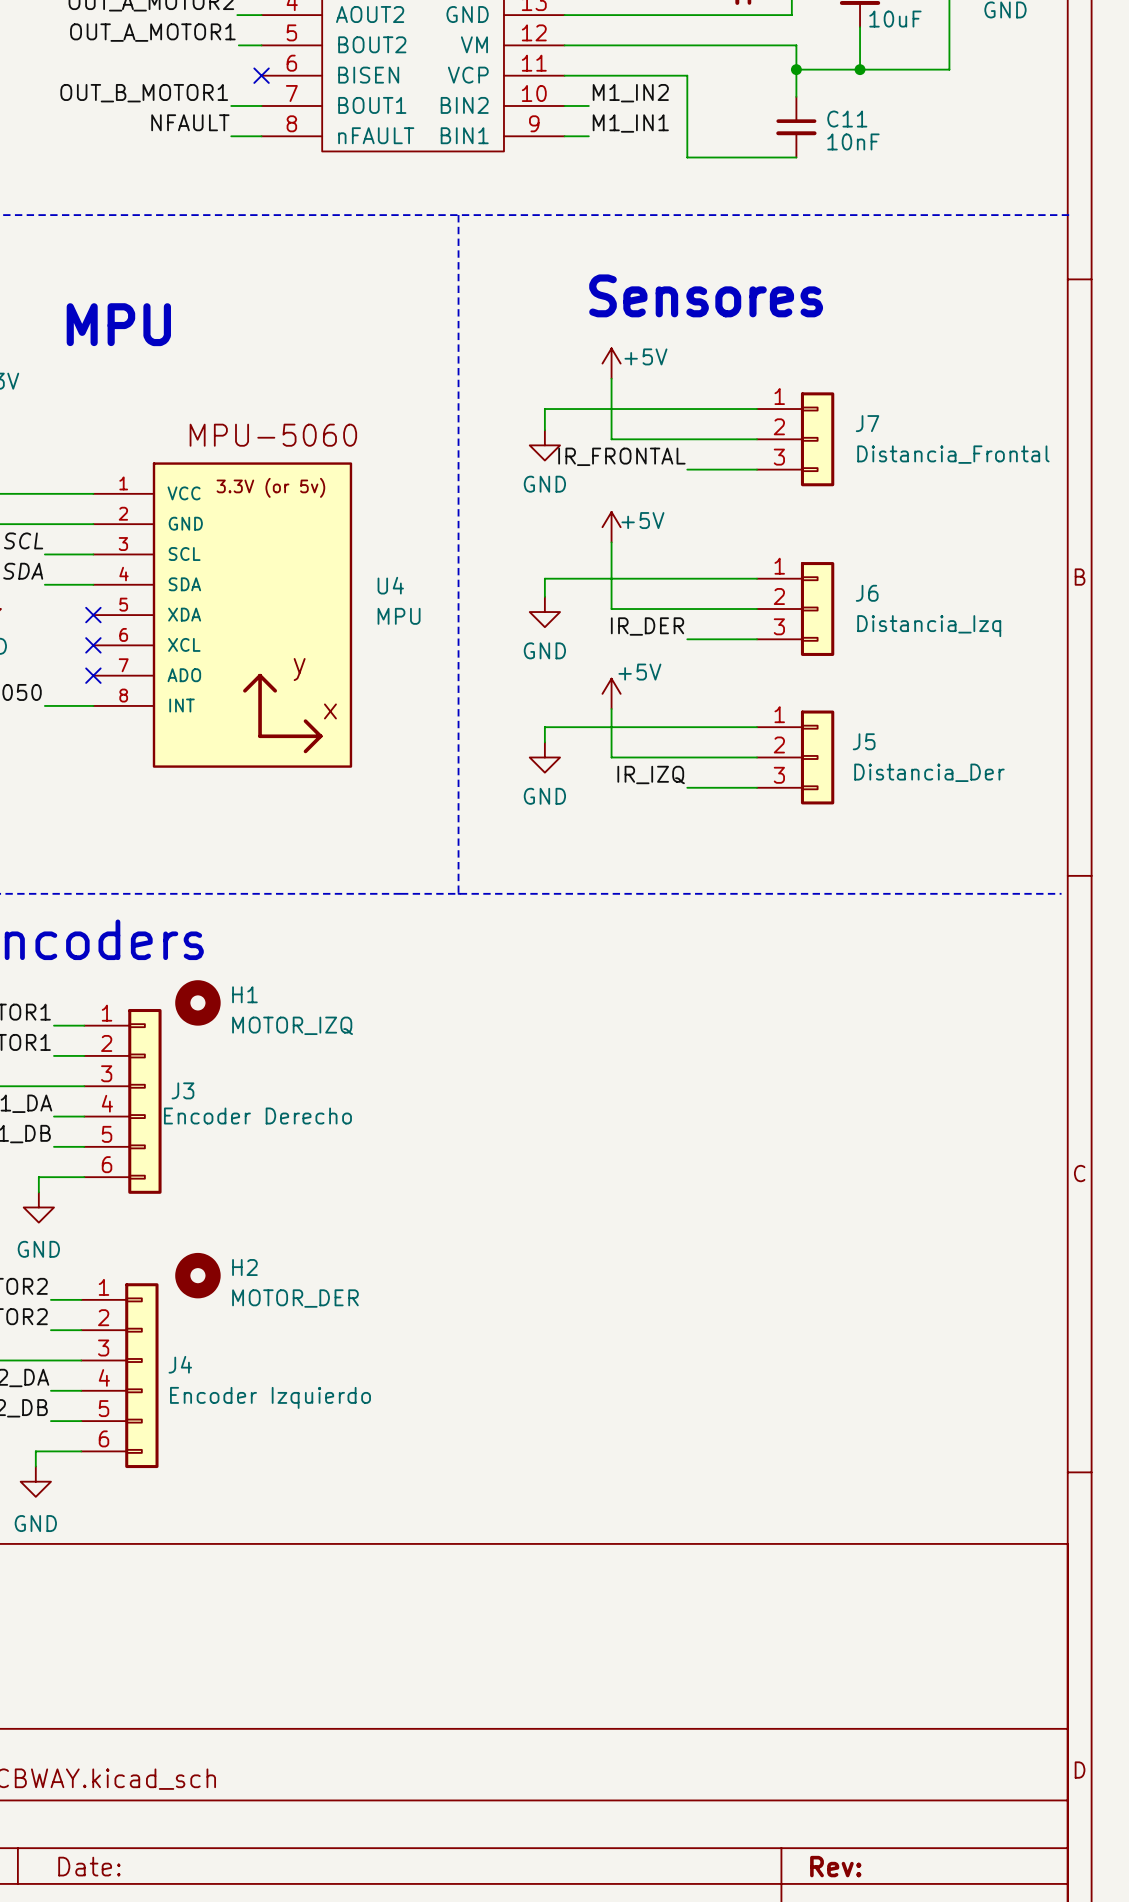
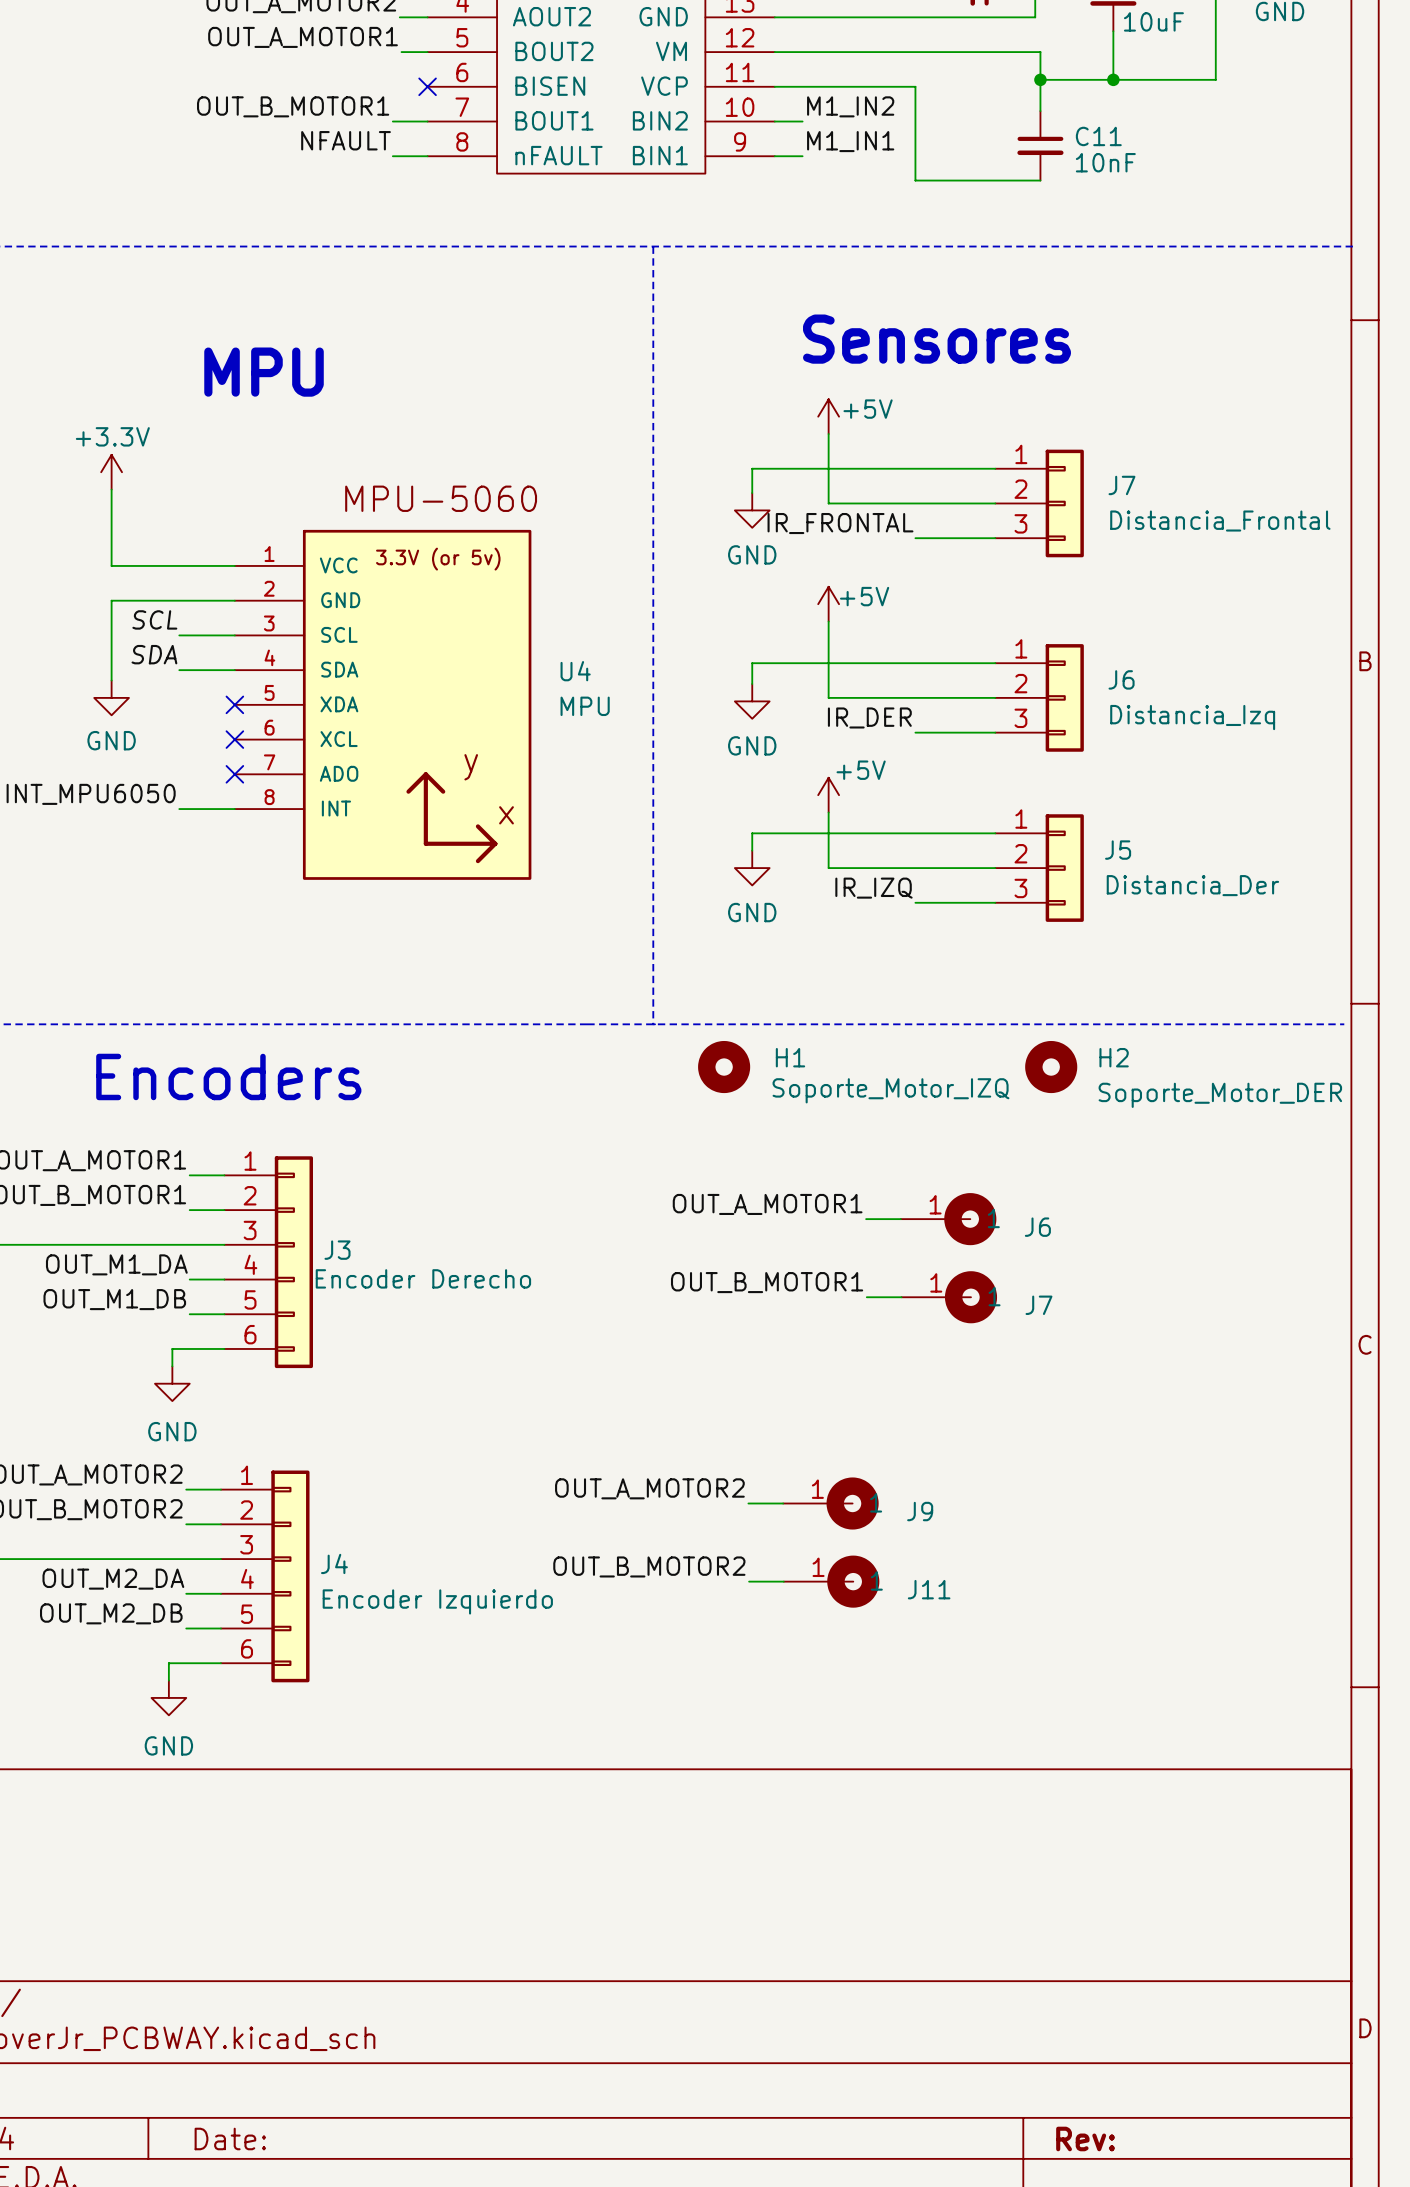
H1 name position: H1 (244, 994) -> H1 (790, 1057)
H1 position: (197, 1002) -> (724, 1067)
H1 value: MOTOR_IZQ (292, 1025) -> Soporte_Motor_IZQ (890, 1090)
label: none -> OUT_A_MOTOR1 (767, 1204)
wire: none -> (866, 1219) (900, 1219)
J6: none -> (948, 1219)
label: none -> OUT_B_MOTOR1 (767, 1282)
wire: none -> (866, 1297) (901, 1297)
J7: none -> (949, 1297)
H2 name position: H2 (244, 1267) -> H2 (1114, 1057)
H2 position: (197, 1275) -> (1051, 1067)
H2 value: MOTOR_DER (295, 1298) -> Soporte_Motor_DER (1220, 1095)
label: none -> OUT_A_MOTOR2 (649, 1488)
wire: none -> (748, 1503) (783, 1503)
J9: none -> (830, 1503)
label: none -> OUT_B_MOTOR2 (649, 1566)
wire: none -> (749, 1581) (783, 1581)
J11: none -> (831, 1581)

